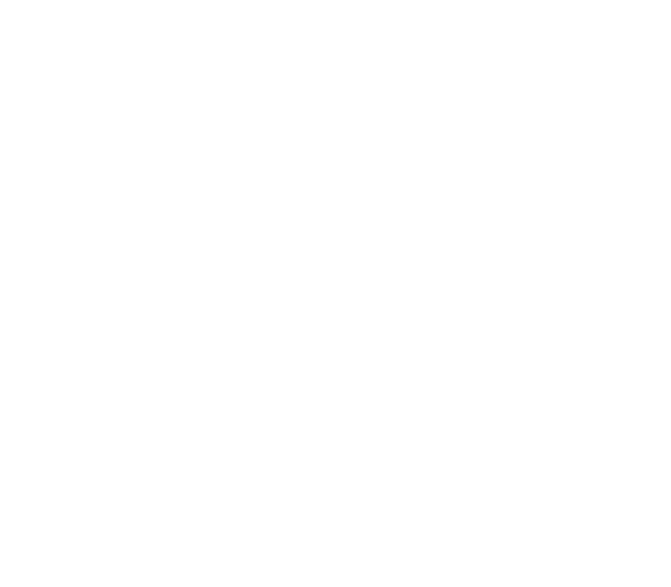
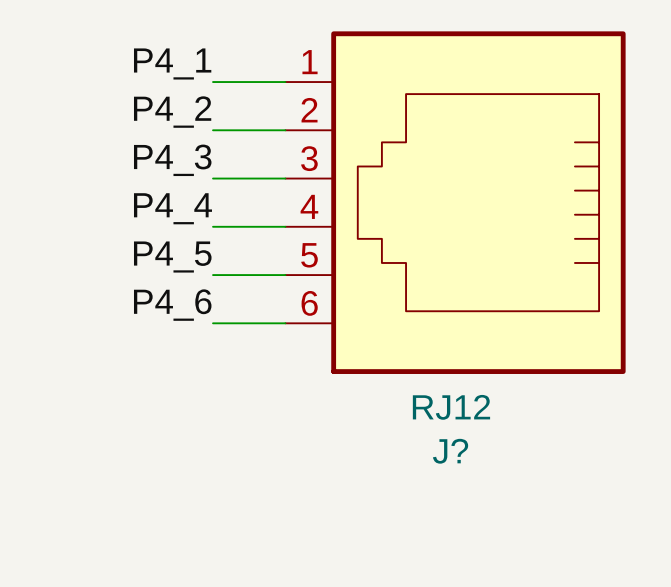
label: none -> P4_1 (172, 63)
wire: none -> (213, 82) (285, 82)
label: none -> P4_2 (172, 112)
wire: none -> (213, 130) (285, 130)
label: none -> P4_3 (172, 160)
wire: none -> (213, 178) (285, 178)
J?: none -> RJ12 (455, 202)
label: none -> P4_4 (172, 208)
wire: none -> (213, 226) (285, 226)
label: none -> P4_5 (172, 257)
wire: none -> (213, 275) (285, 275)
label: none -> P4_6 (172, 305)
wire: none -> (213, 323) (285, 323)

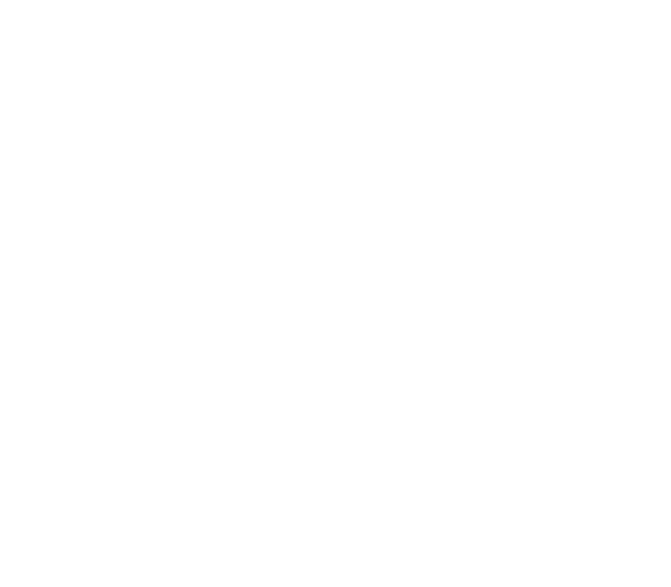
label: P4_1 (172, 63) -> none
wire: (213, 82) (285, 82) -> none
label: P4_2 (172, 112) -> none
wire: (213, 130) (285, 130) -> none
label: P4_3 (172, 160) -> none
wire: (213, 178) (285, 178) -> none
J?: RJ12 (455, 202) -> none
label: P4_4 (172, 208) -> none
wire: (213, 226) (285, 226) -> none
label: P4_5 (172, 257) -> none
wire: (213, 275) (285, 275) -> none
label: P4_6 (172, 305) -> none
wire: (213, 323) (285, 323) -> none

